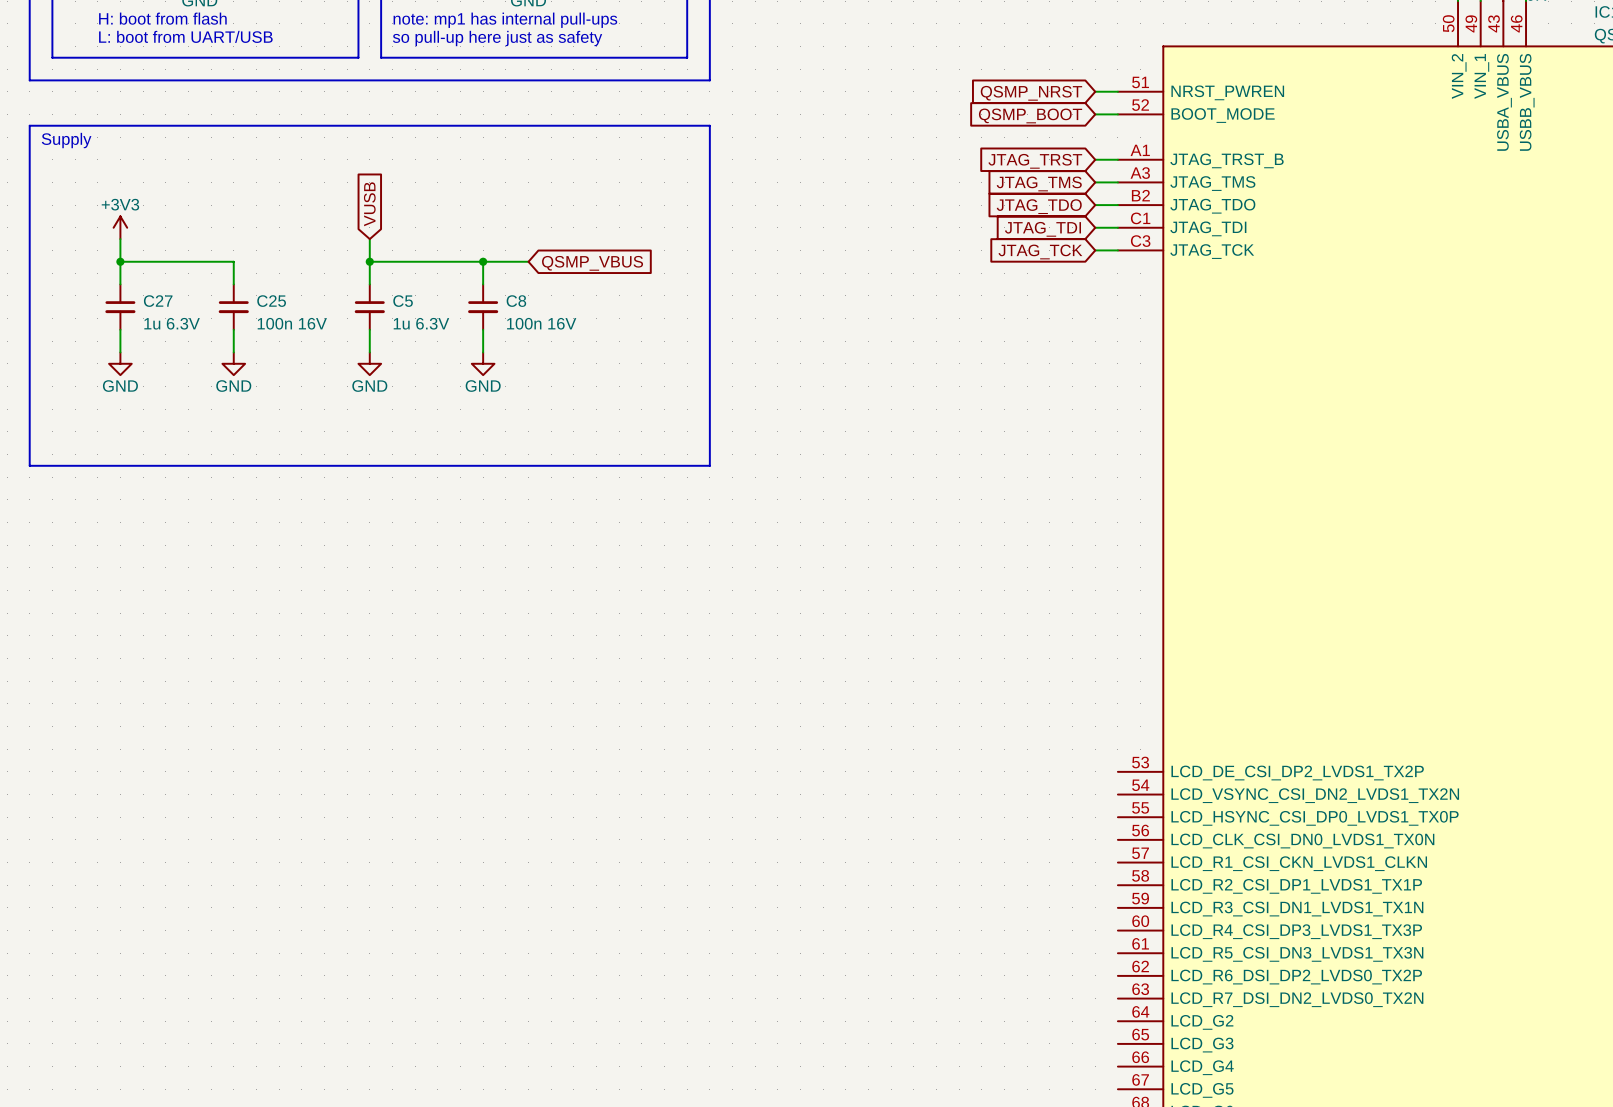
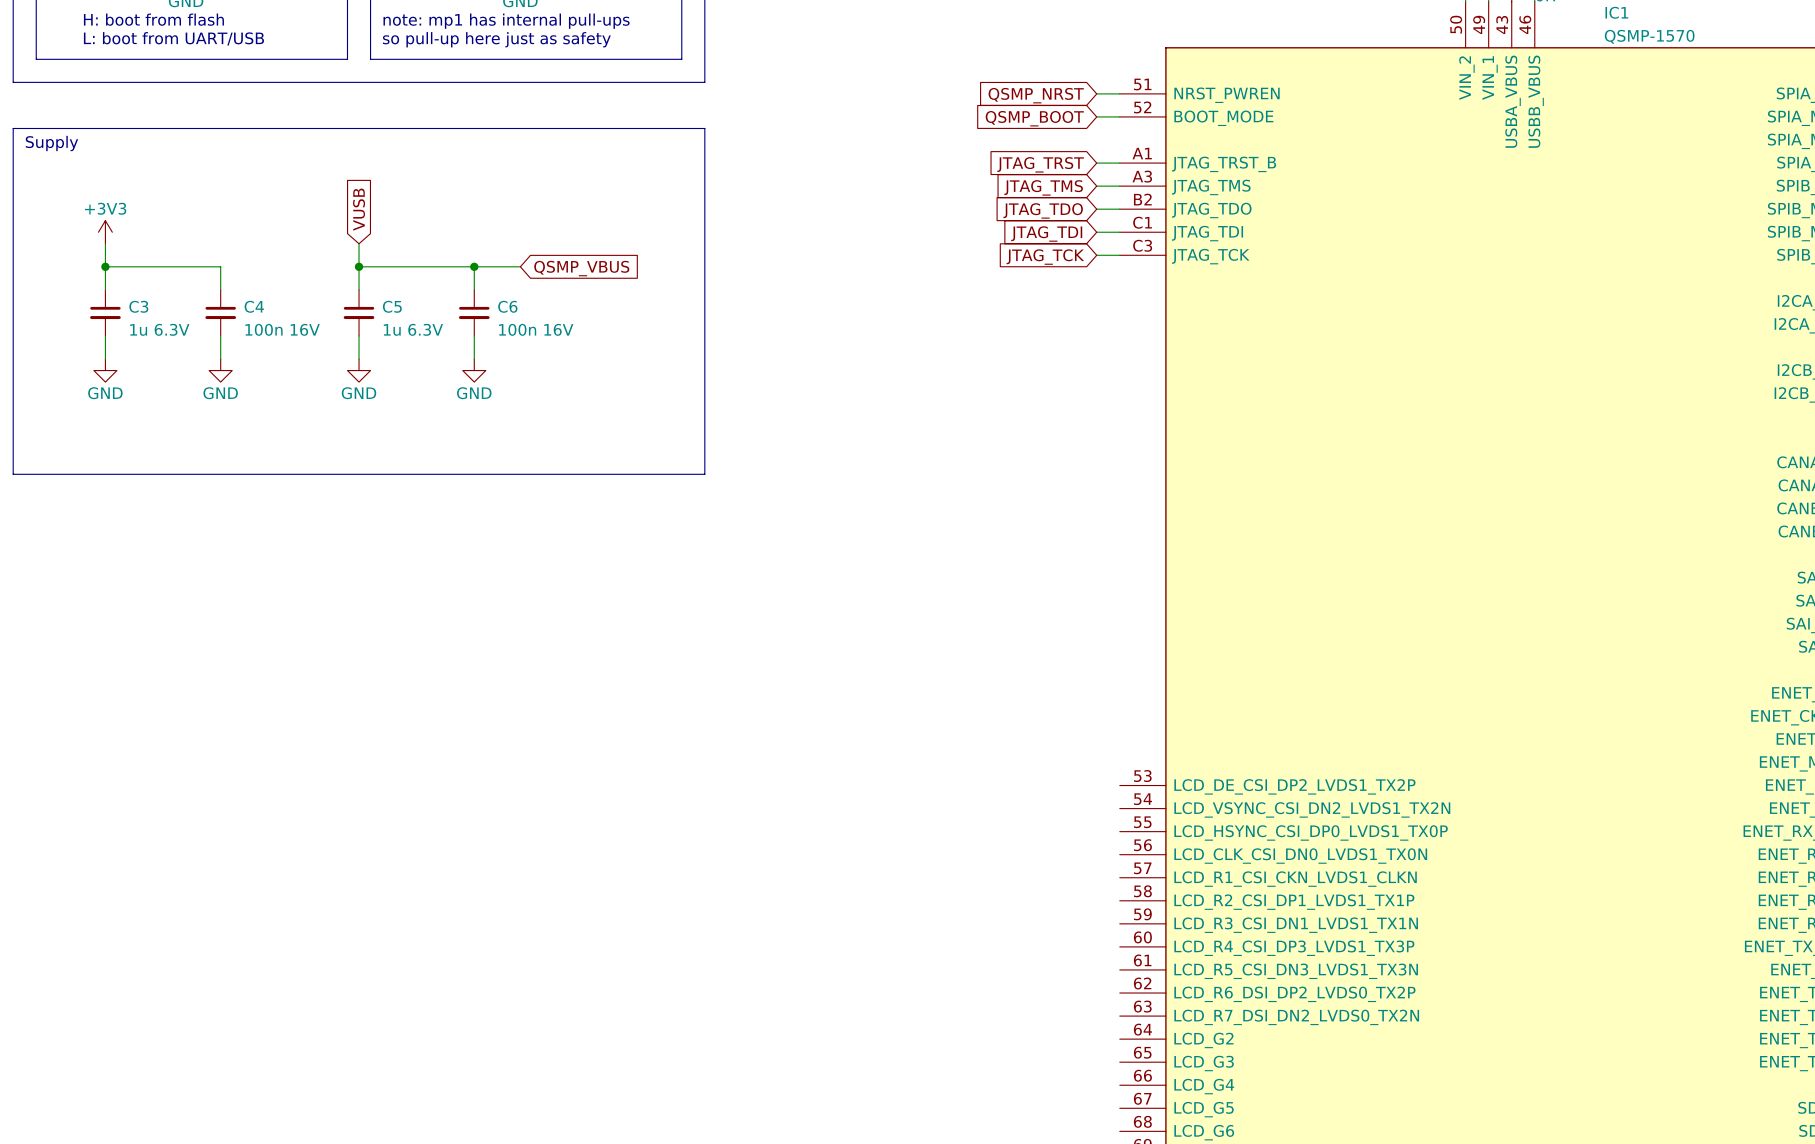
C27 name: C27 (158, 301) -> C3 (138, 306)
C25 name: C25 (271, 301) -> C4 (254, 306)
C8 name: C8 (516, 301) -> C6 (507, 306)

